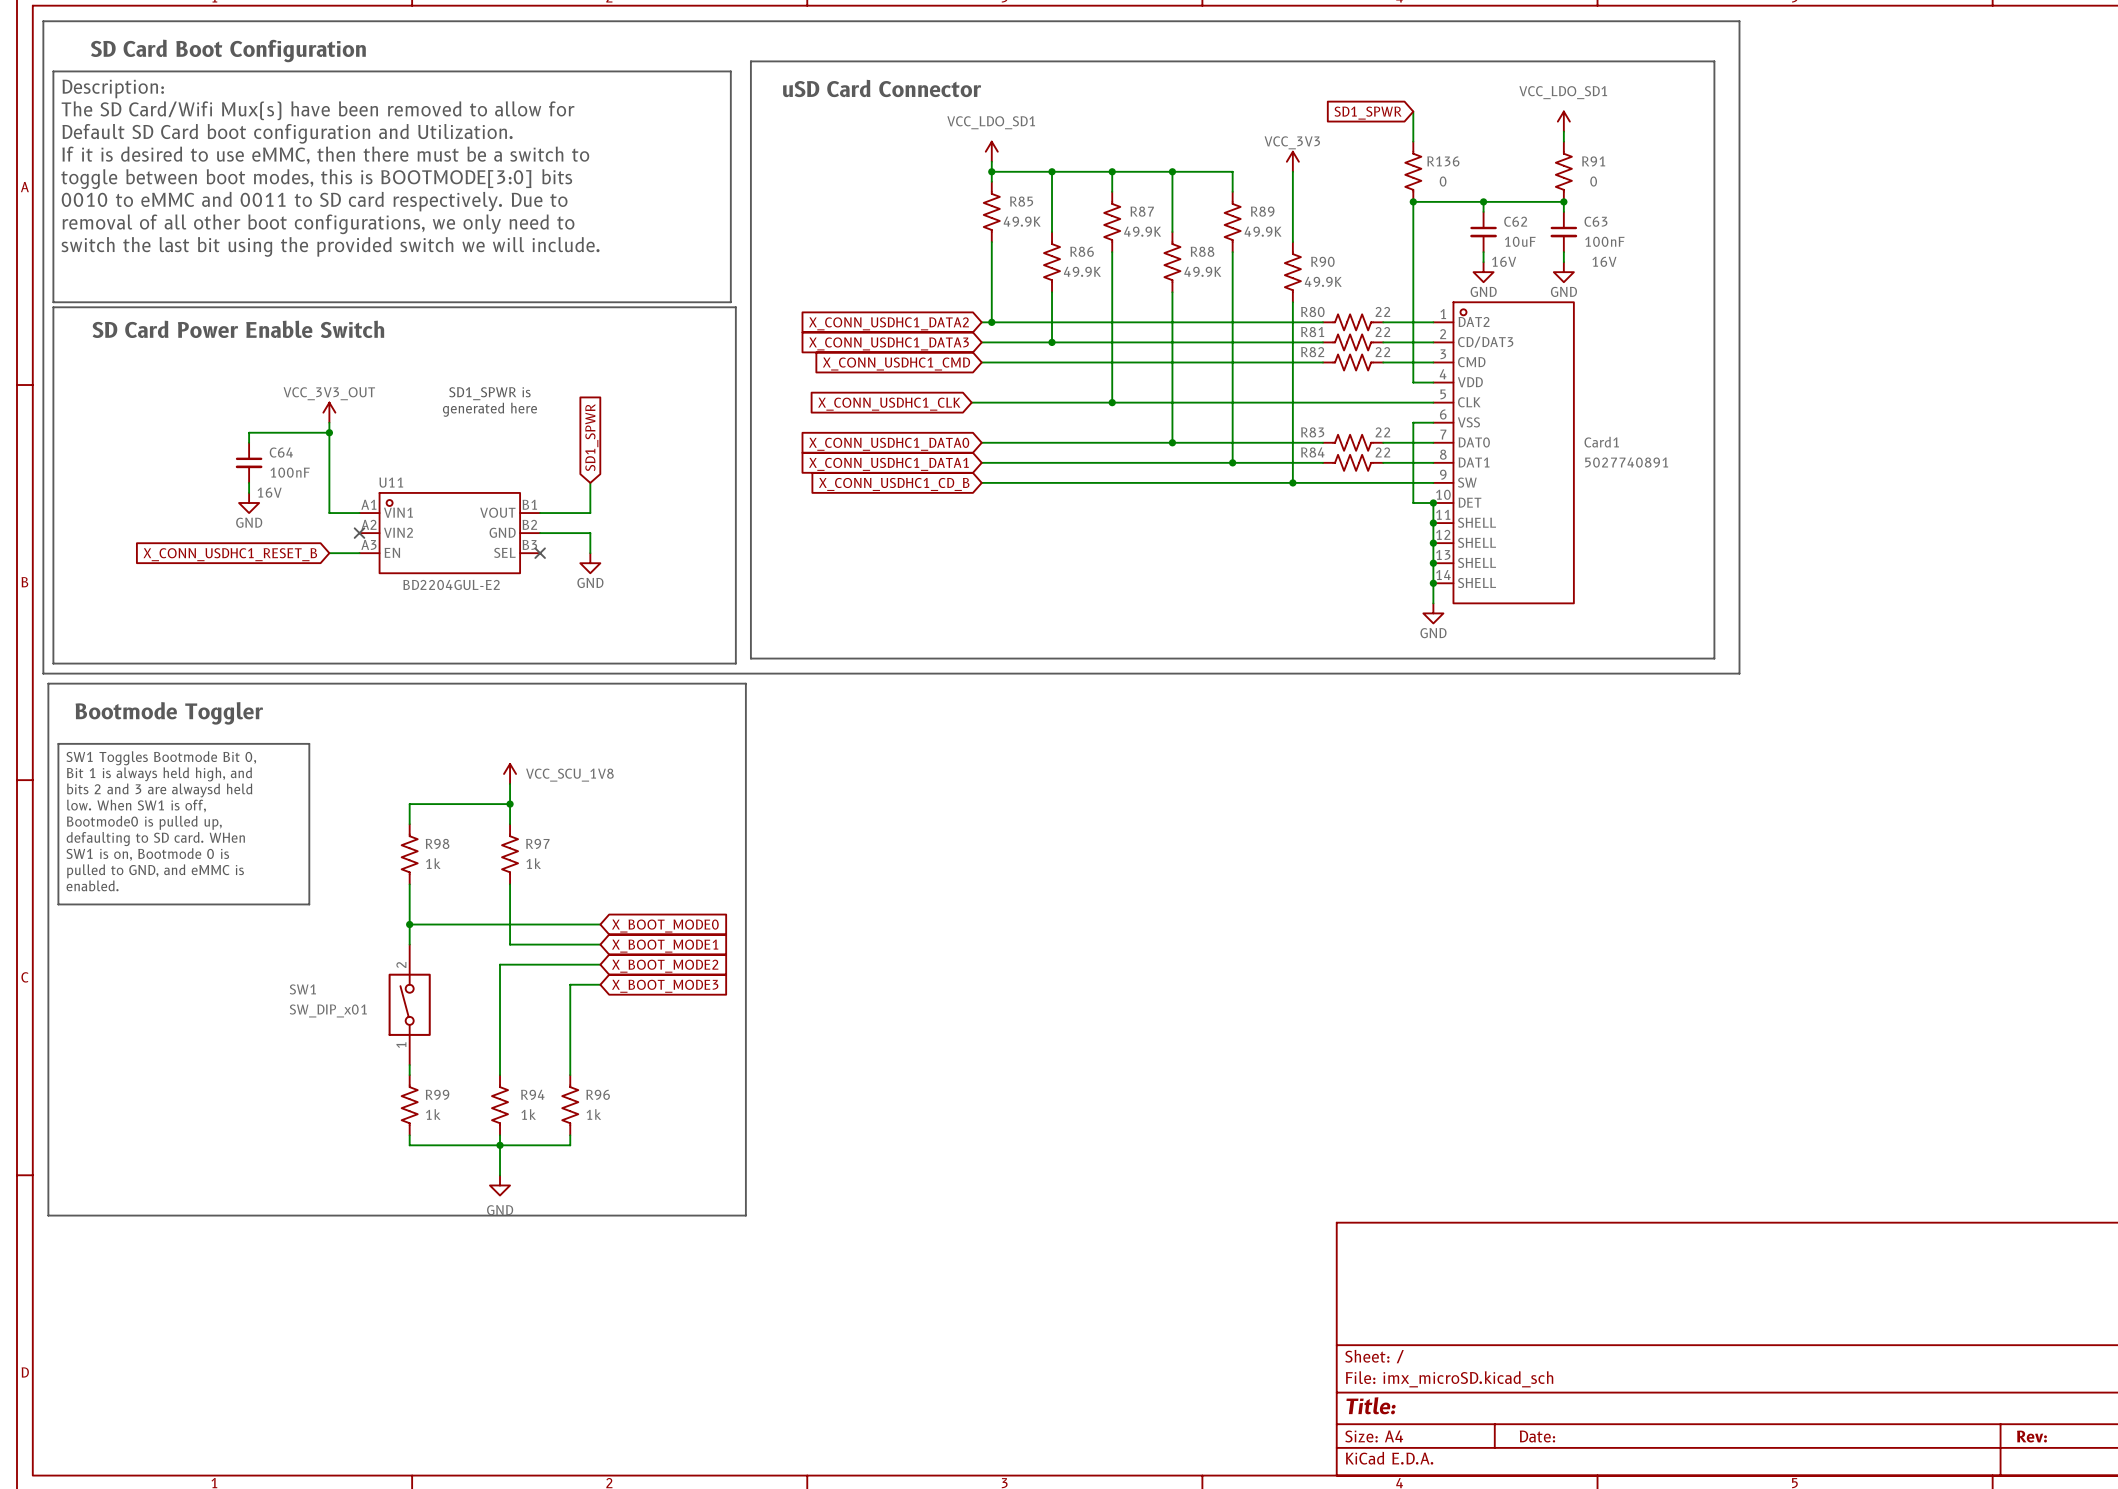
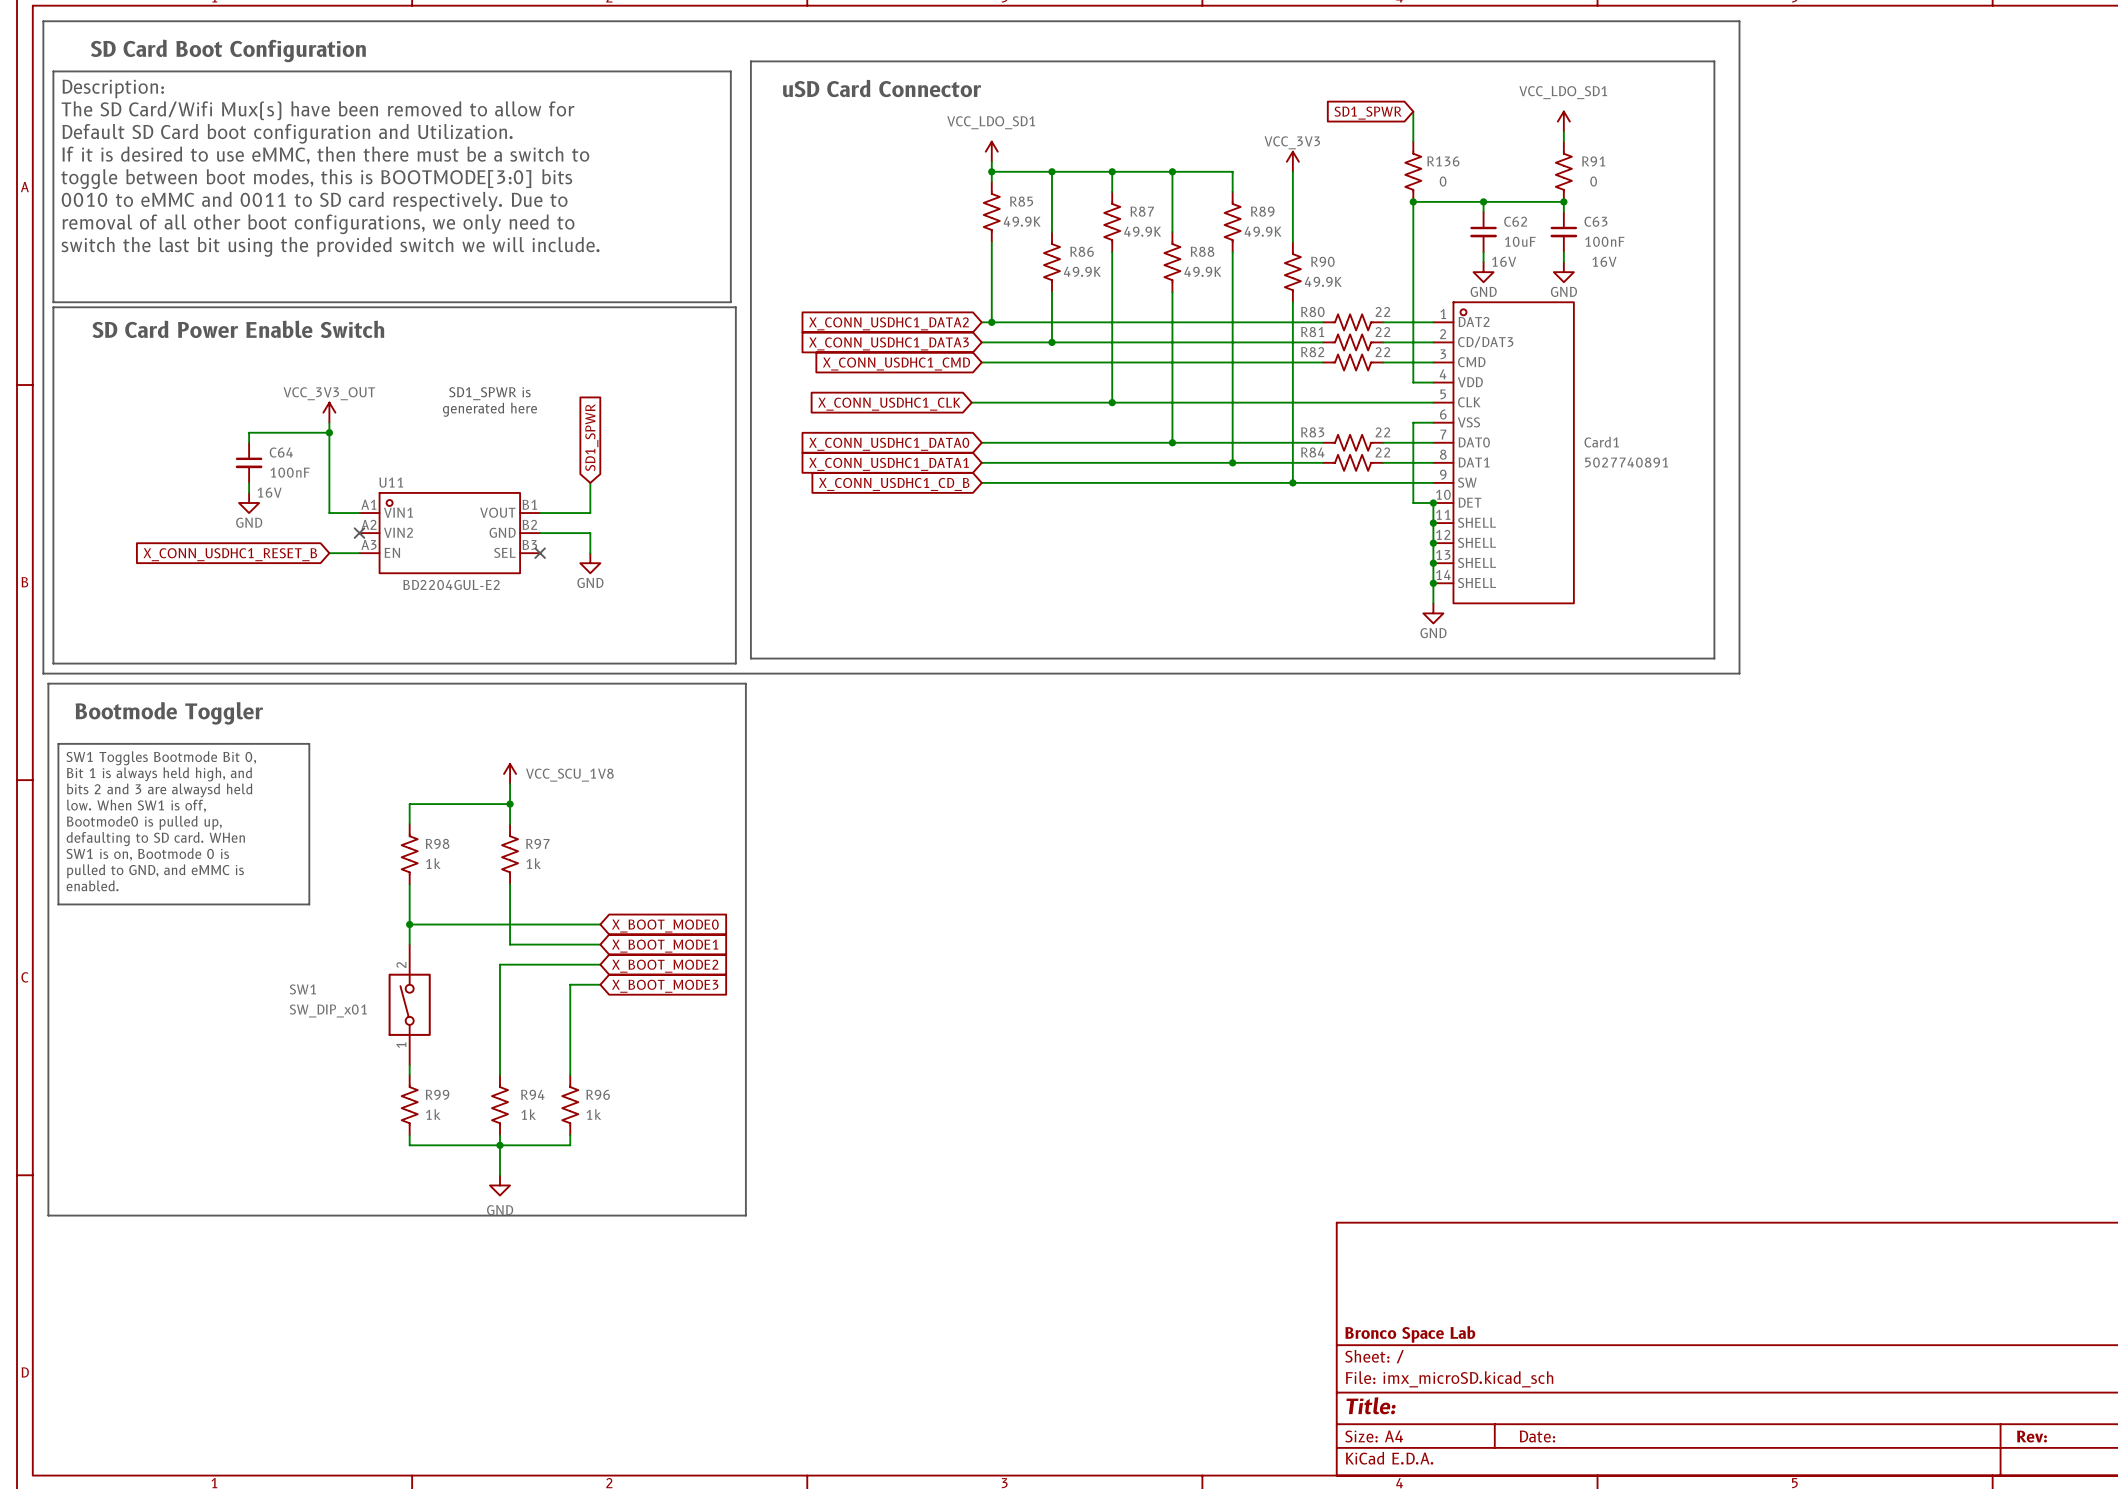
title block: none -> Bronco Space Lab (1410, 1334)

